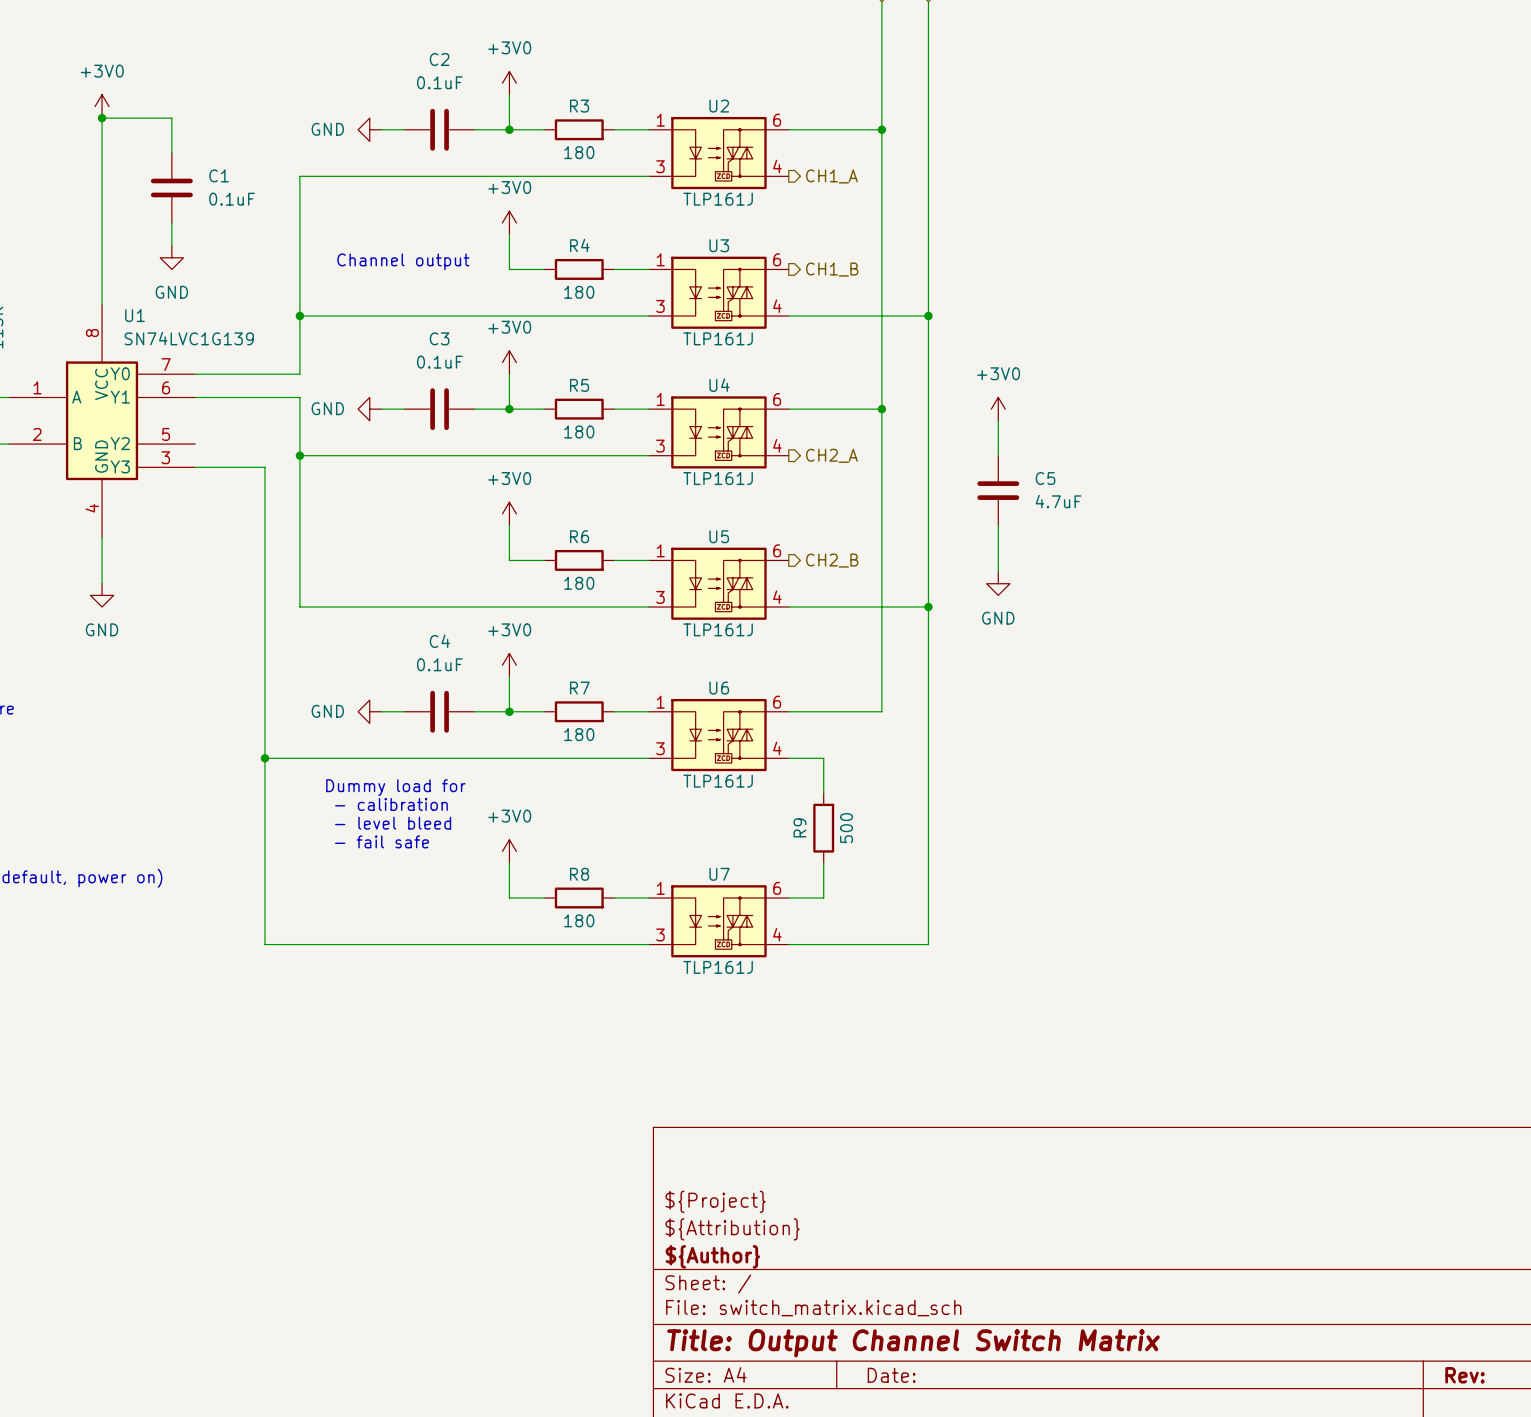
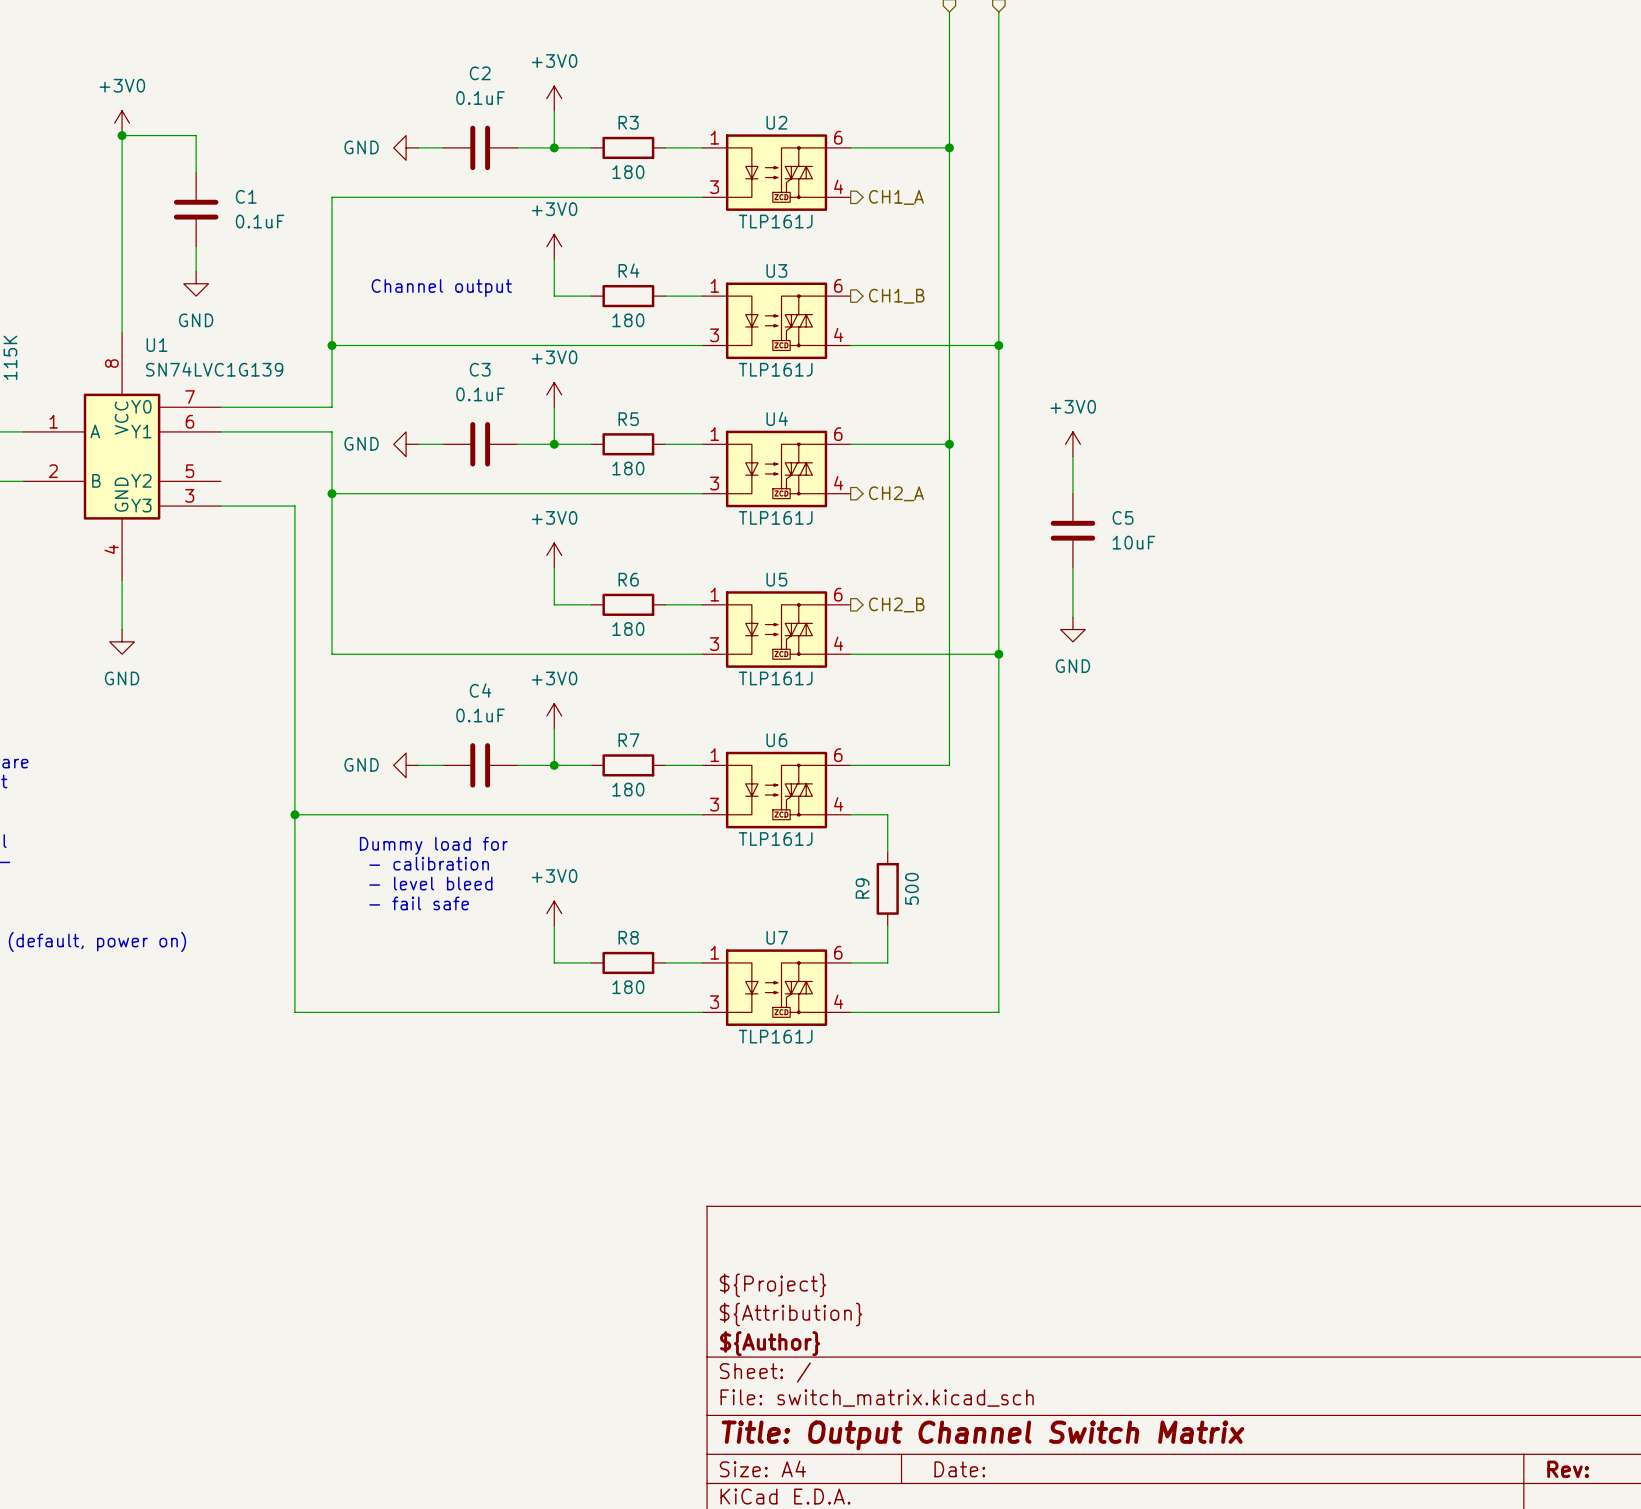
C5 value: 4.7uF (1058, 501) -> 10uF (1133, 542)

